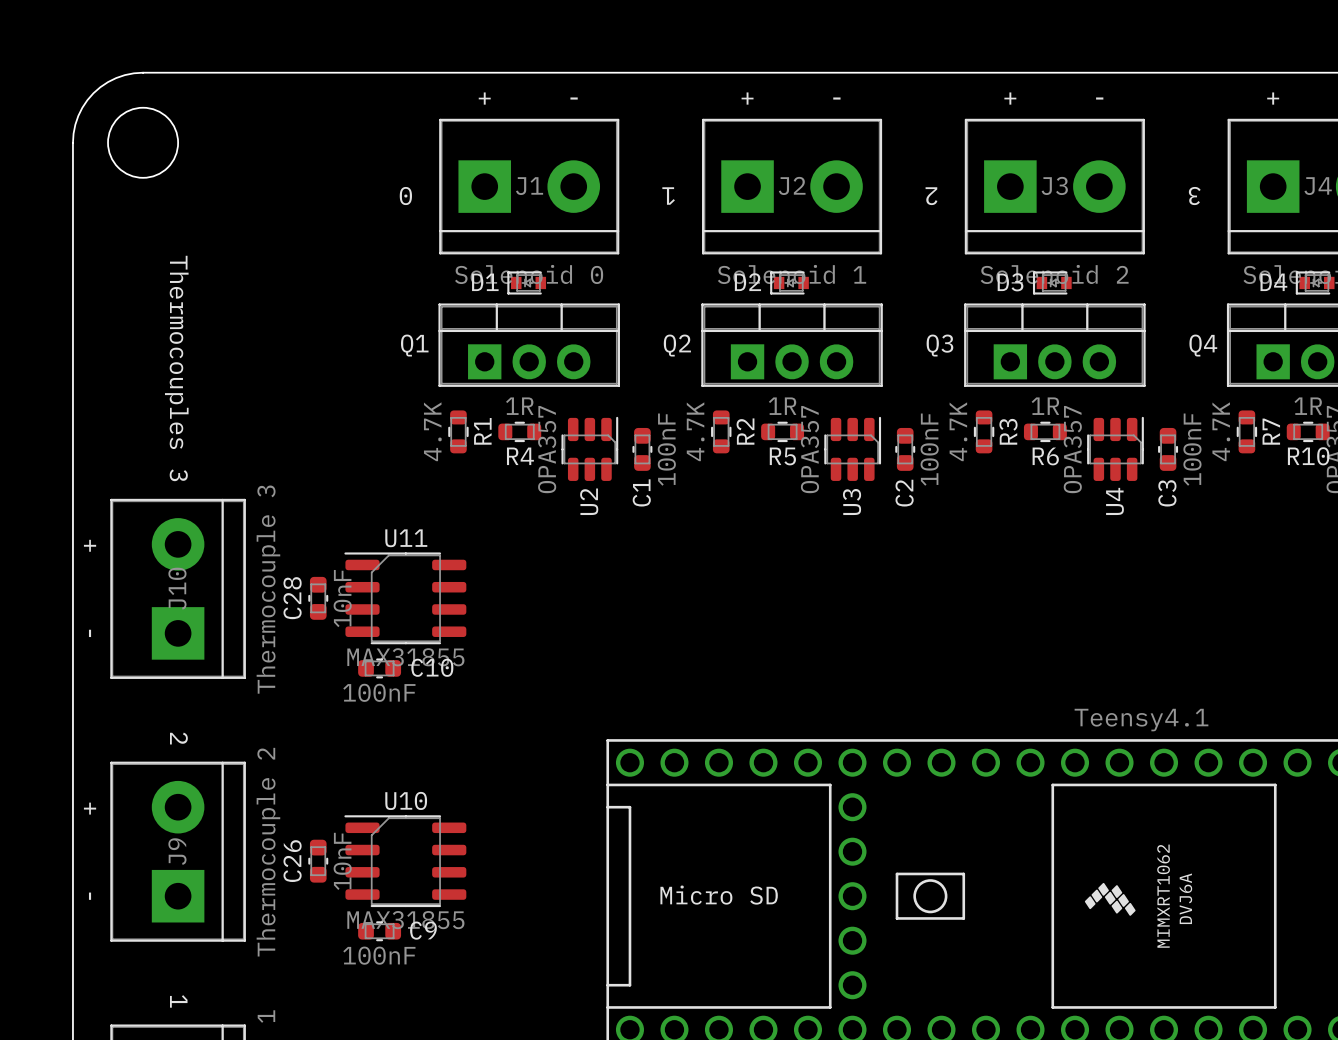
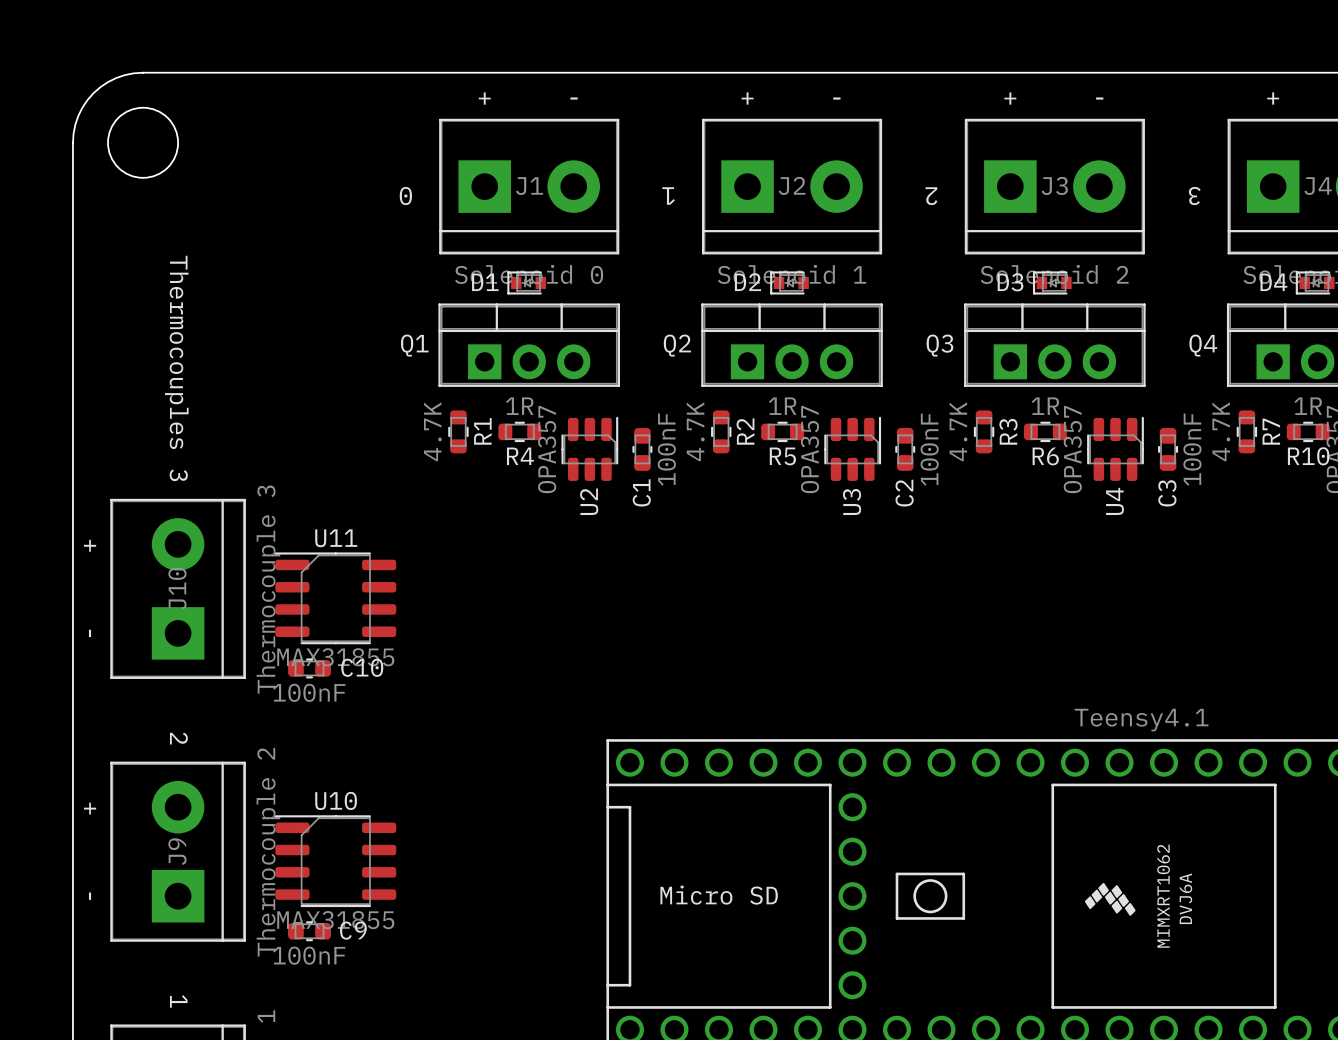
C28: 10nF (318, 598) -> none
U11 position: (405, 598) -> (335, 598)
C10 position: (379, 668) -> (309, 668)
C26: 10nF (318, 861) -> none
U10 position: (405, 861) -> (335, 861)
C9 position: (379, 931) -> (309, 931)

